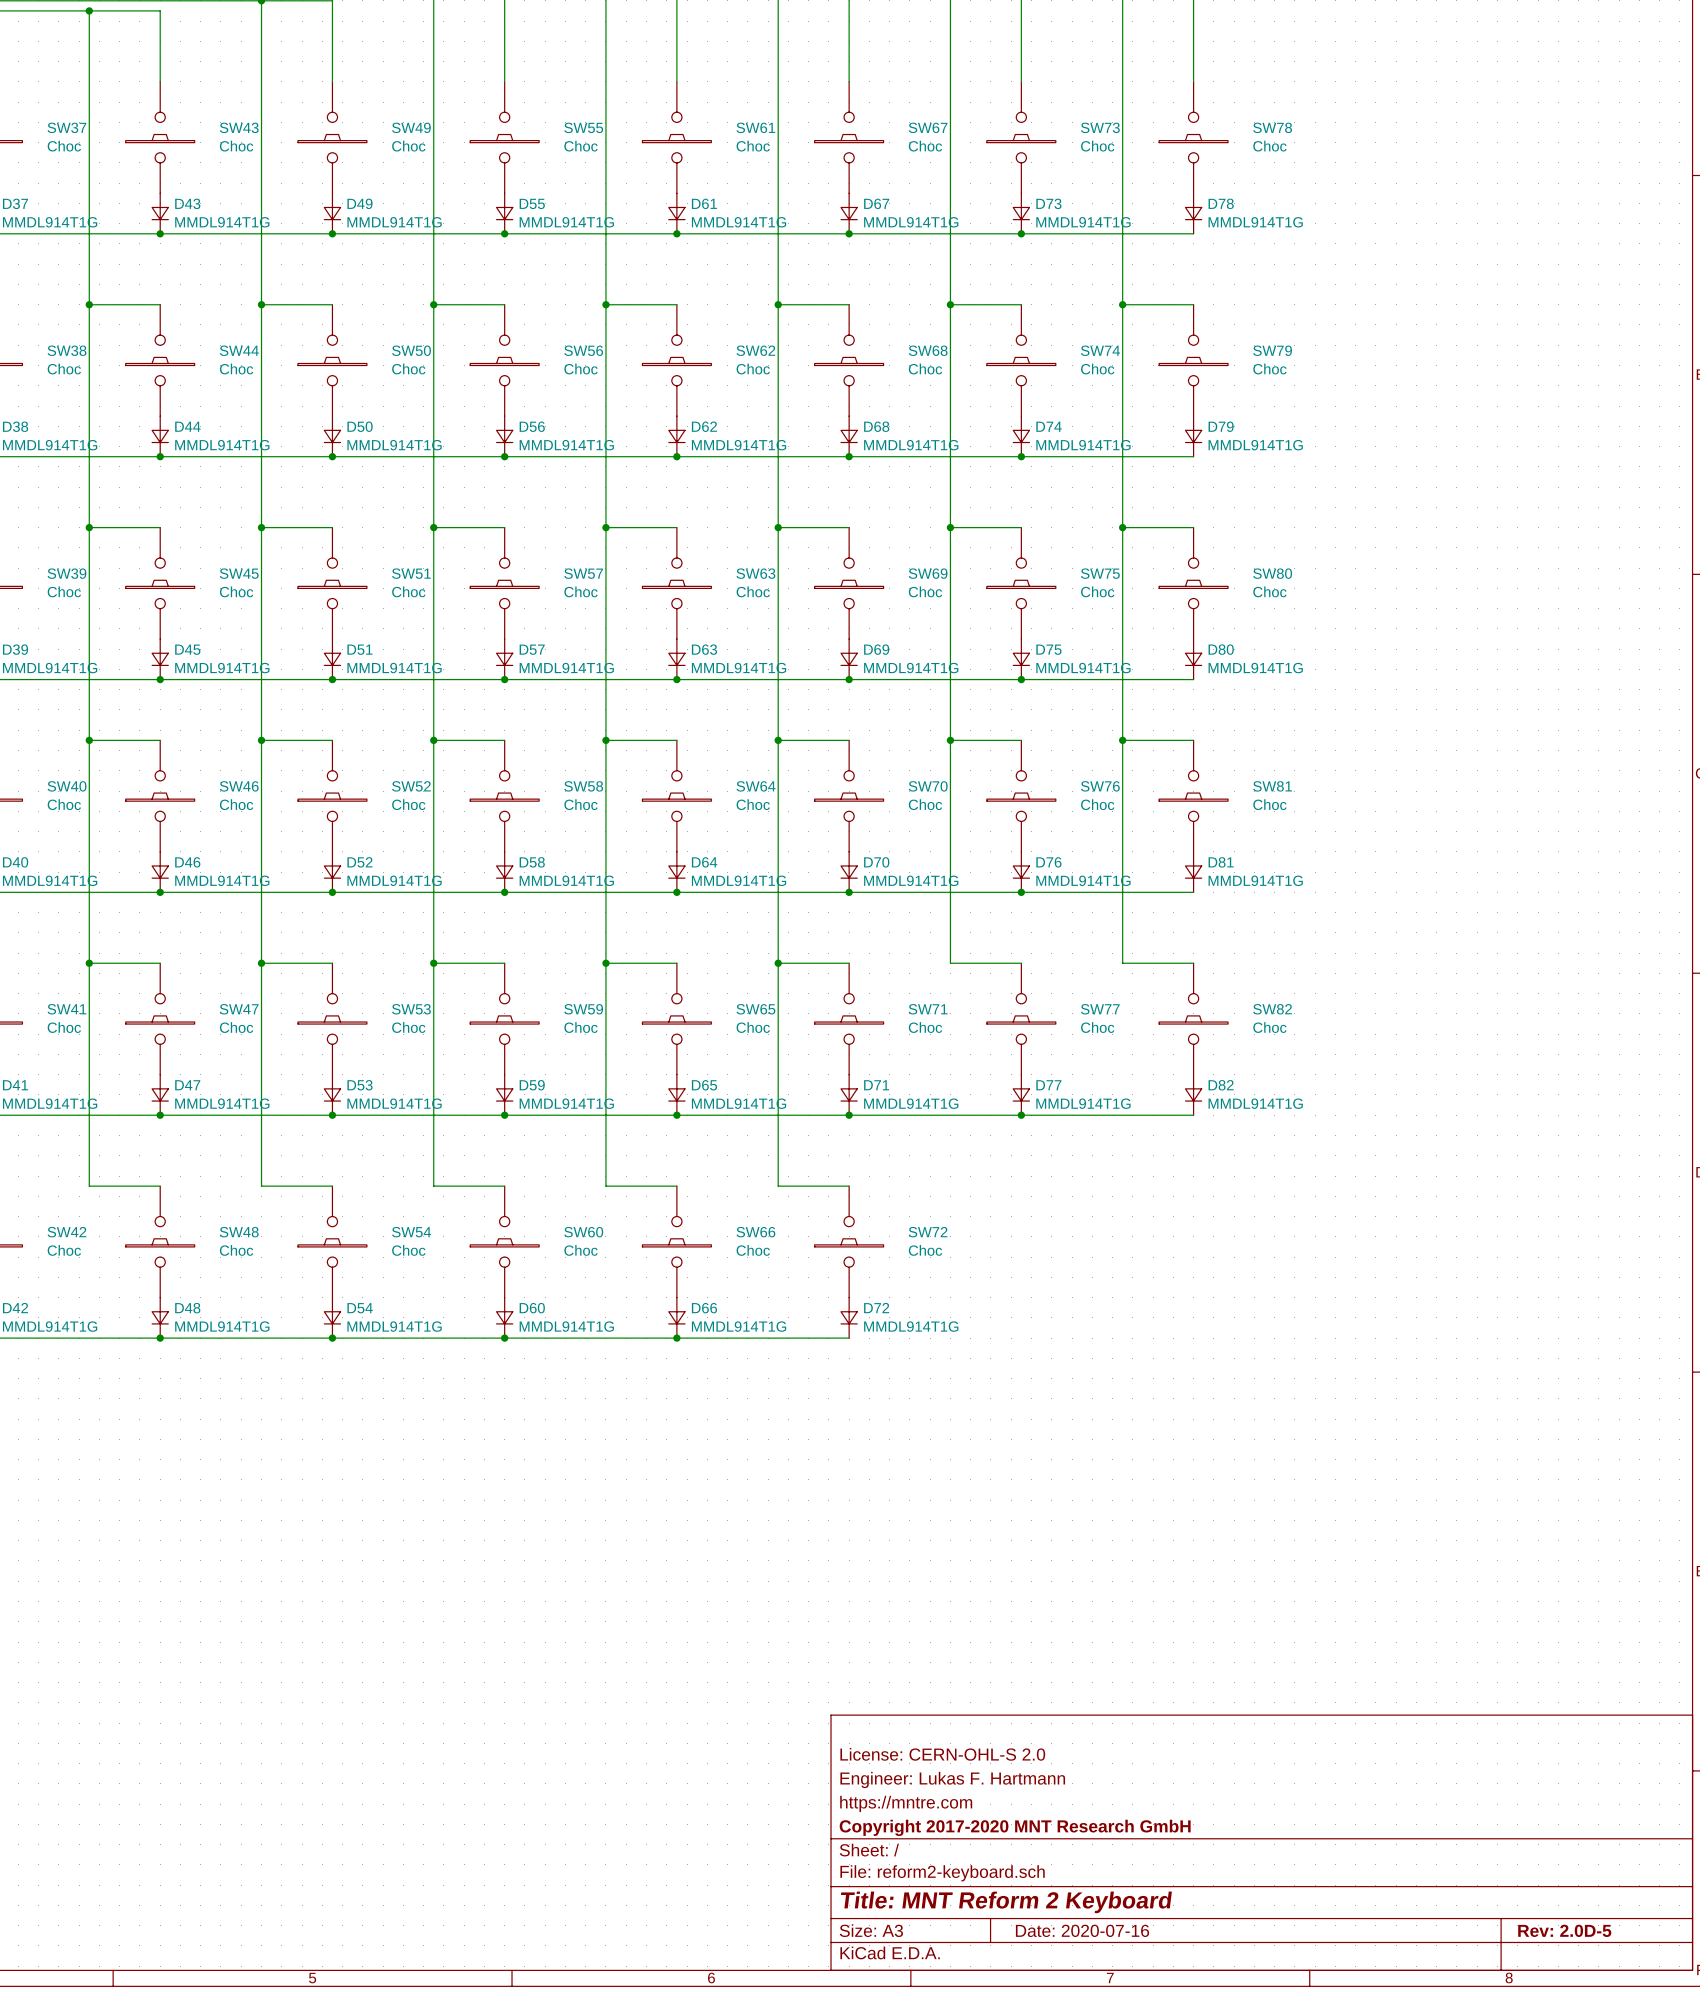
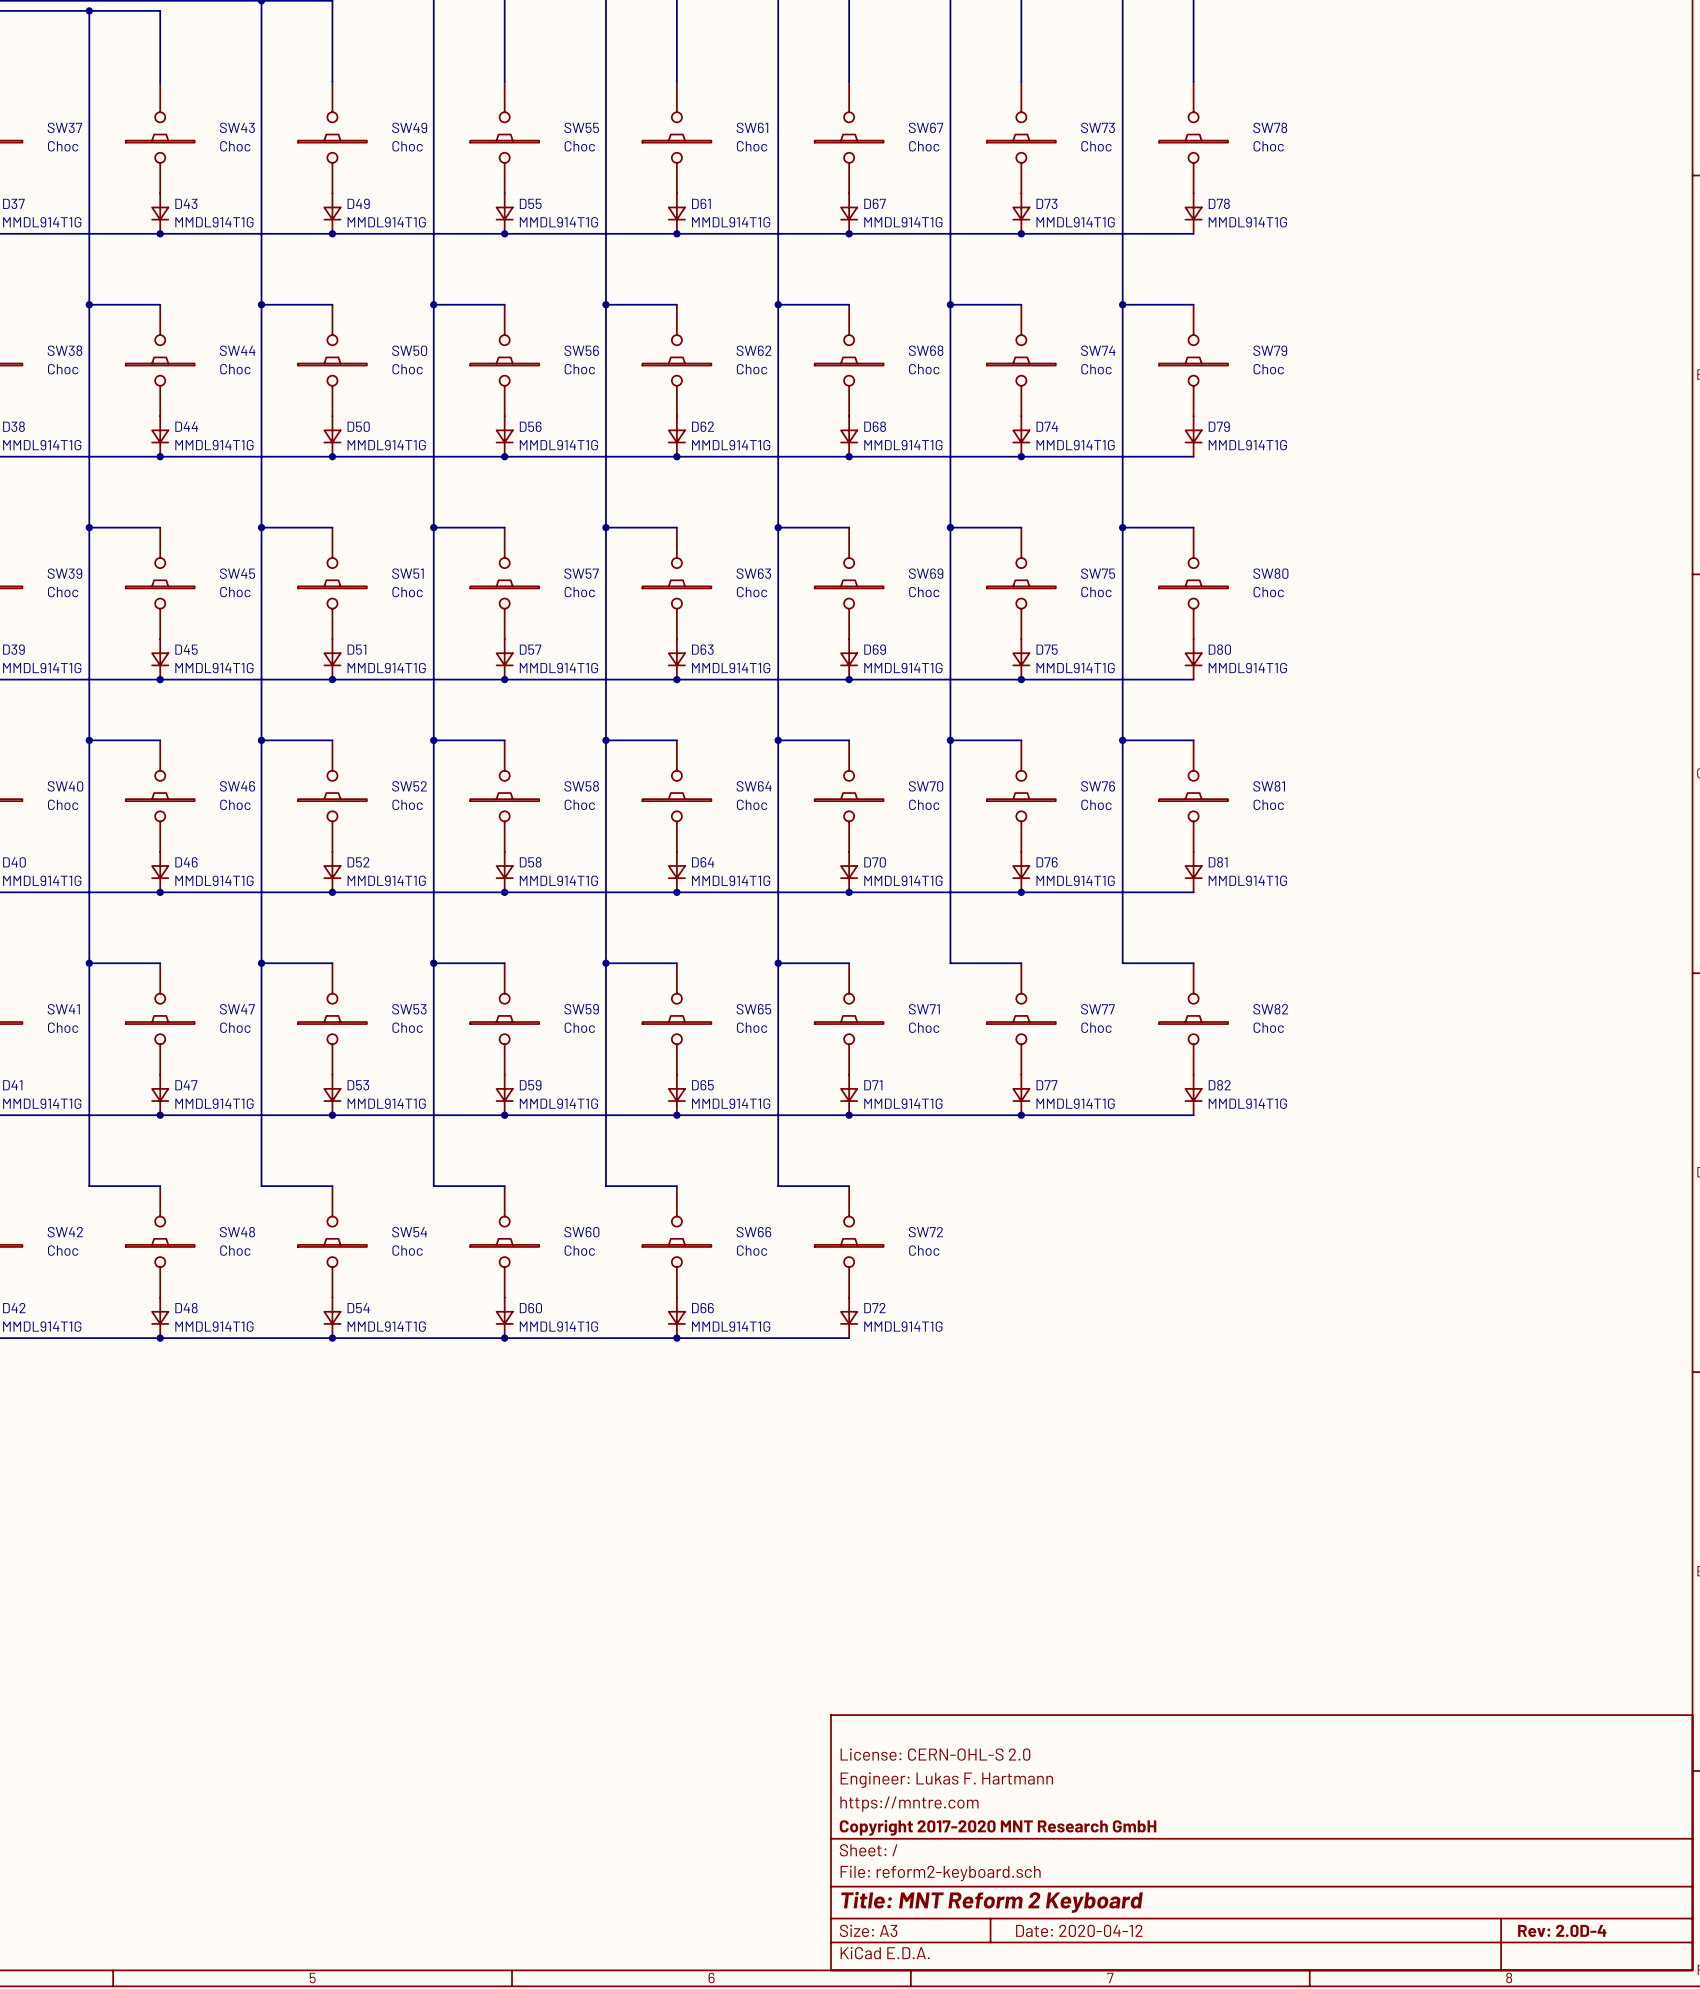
title block: Date: 2020-07-16 (1082, 1930) -> Date: 2020-04-12 (1079, 1930)
title block: Rev: 2.0D-5 (1564, 1930) -> Rev: 2.0D-4 (1562, 1930)

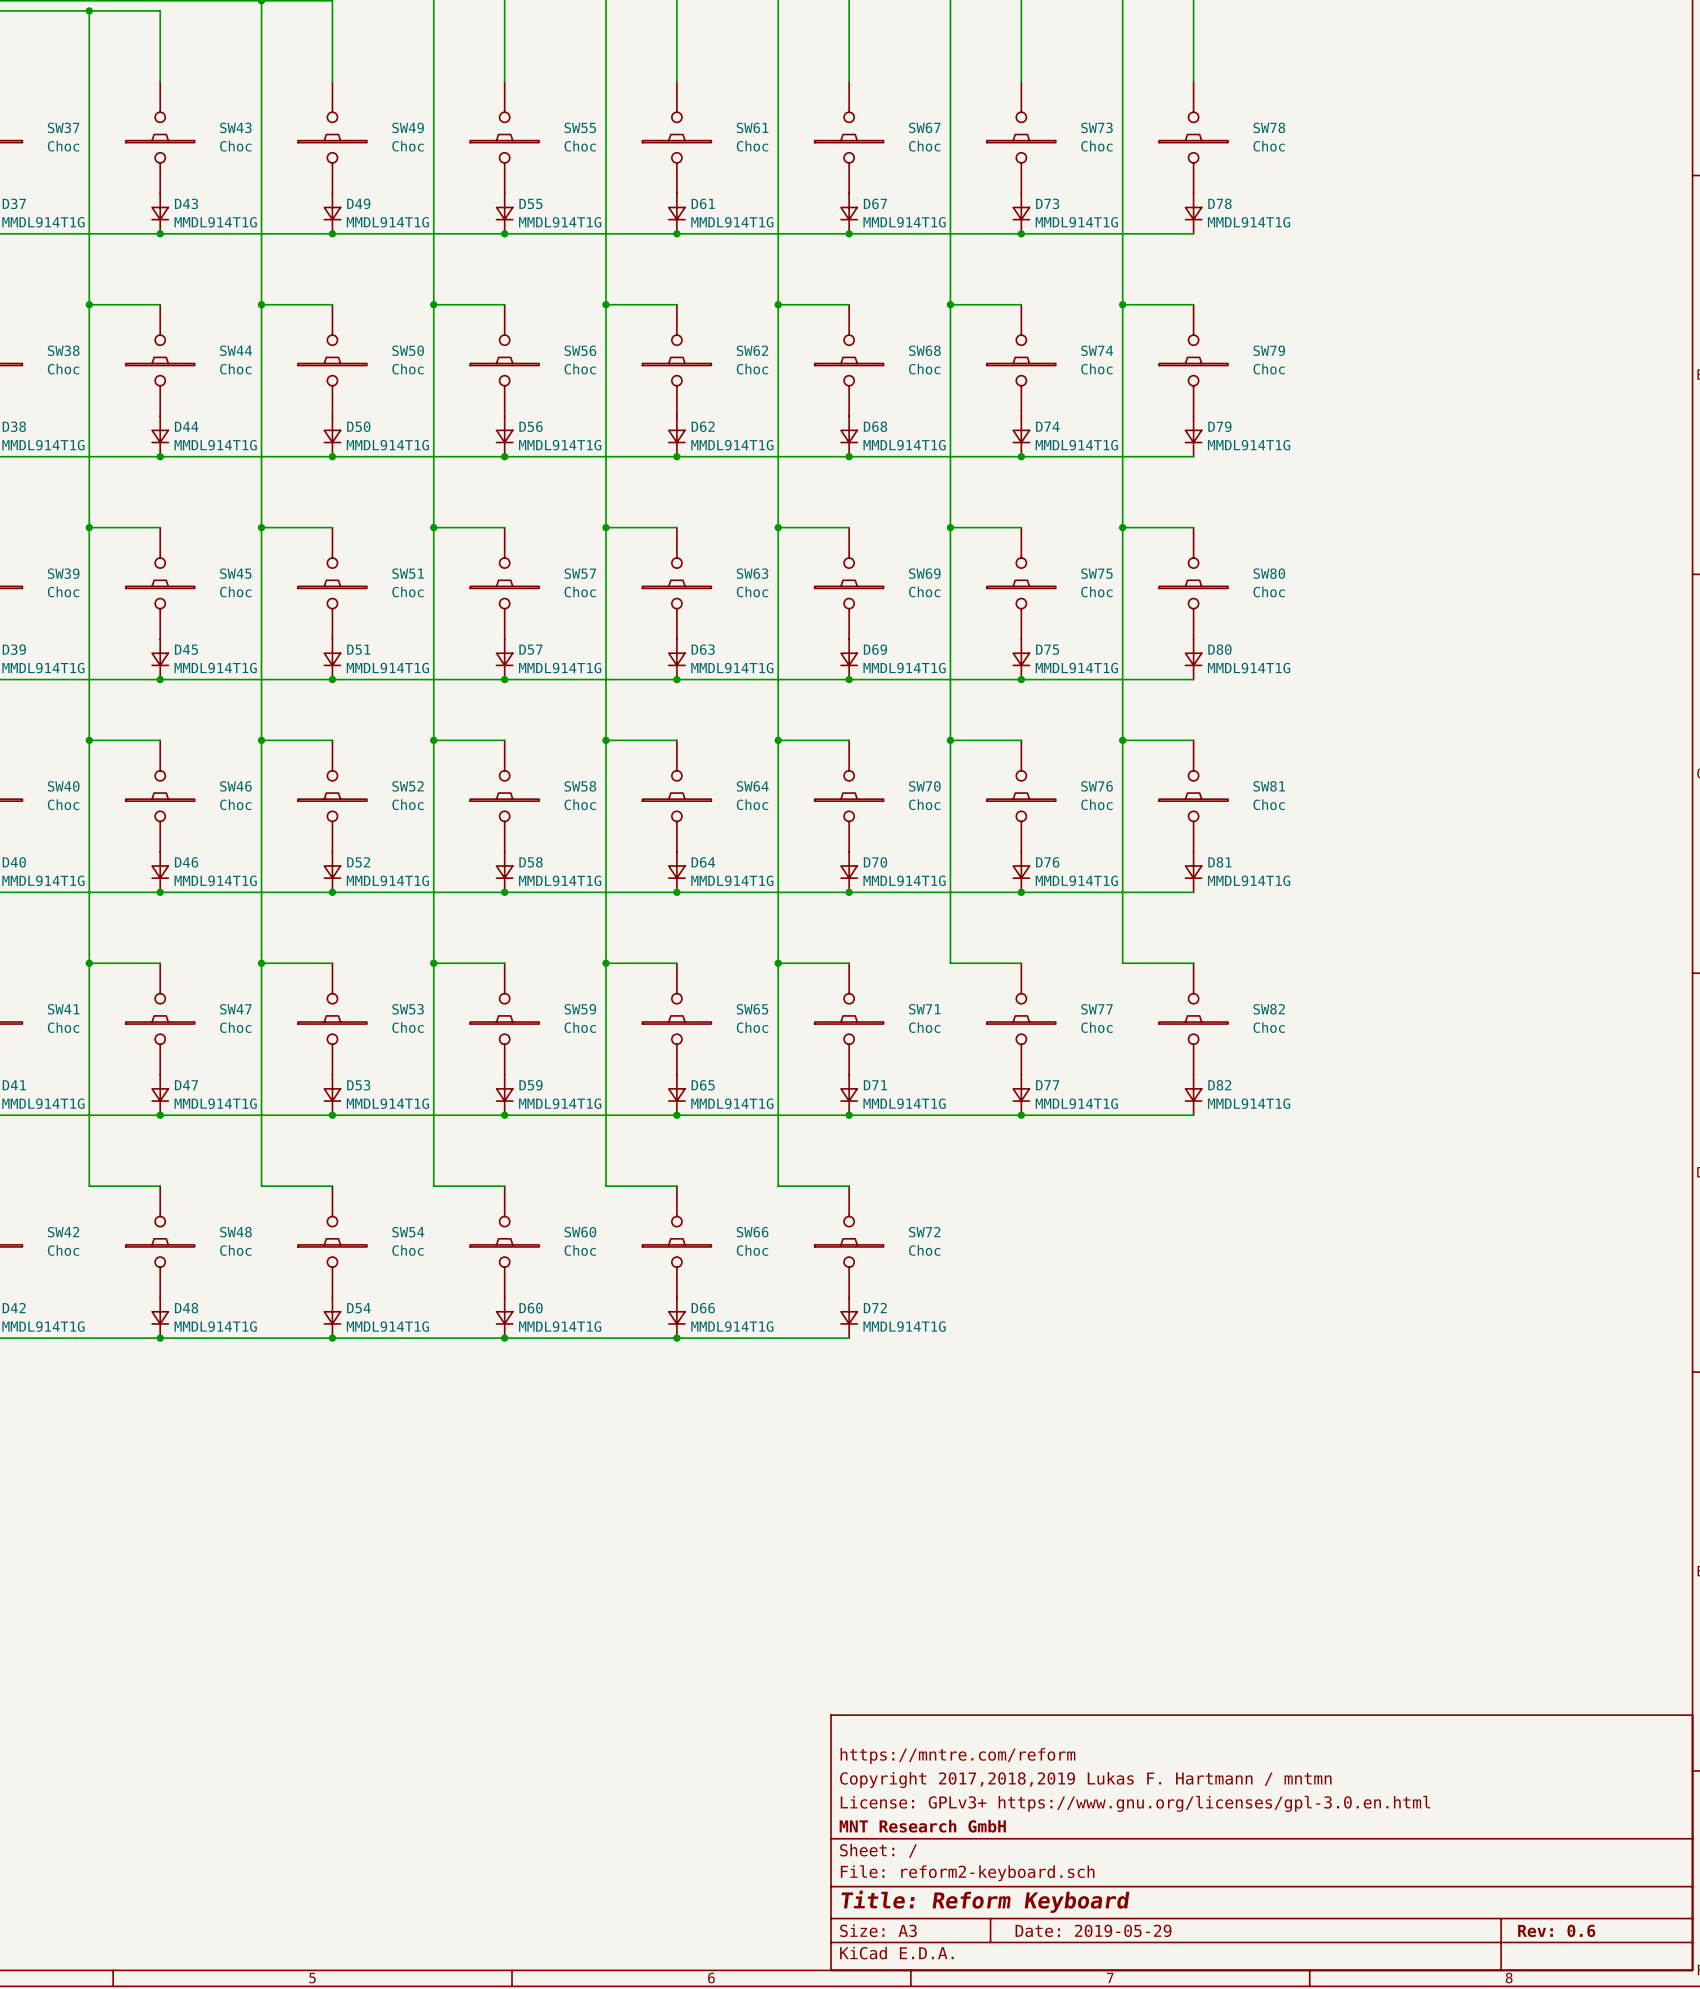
title block: License: CERN-OHL-S 2.0 (935, 1754) -> https://mntre.com/reform (957, 1756)
title block: Engineer: Lukas F. Hartmann (946, 1780) -> Copyright 2017,2018,2019 Lukas F. Hartmann / mntmn (1085, 1780)
title block: https://mntre.com (909, 1804) -> License: GPLv3+ https://www.gnu.org/licenses/gpl-3.0.en.html (1135, 1803)
title block: Copyright 2017-2020 MNT Research GmbH (998, 1827) -> MNT Research GmbH (922, 1826)
title block: Title: MNT Reform 2 Keyboard (992, 1902) -> Title: Reform Keyboard (985, 1901)
title block: Date: 2020-04-12 (1079, 1930) -> Date: 2019-05-29 (1093, 1930)
title block: Rev: 2.0D-4 (1562, 1930) -> Rev: 0.6 (1556, 1930)

